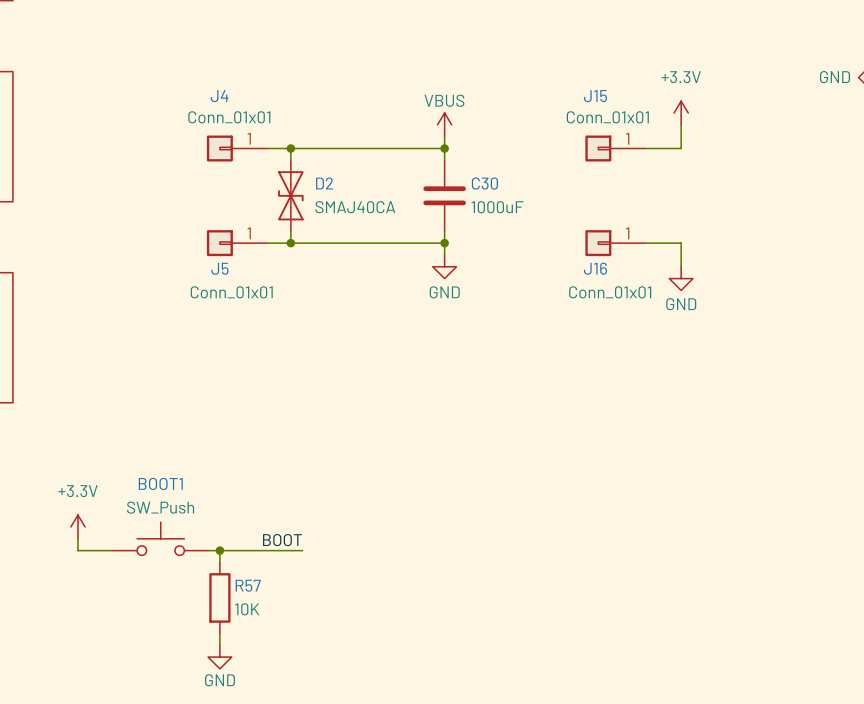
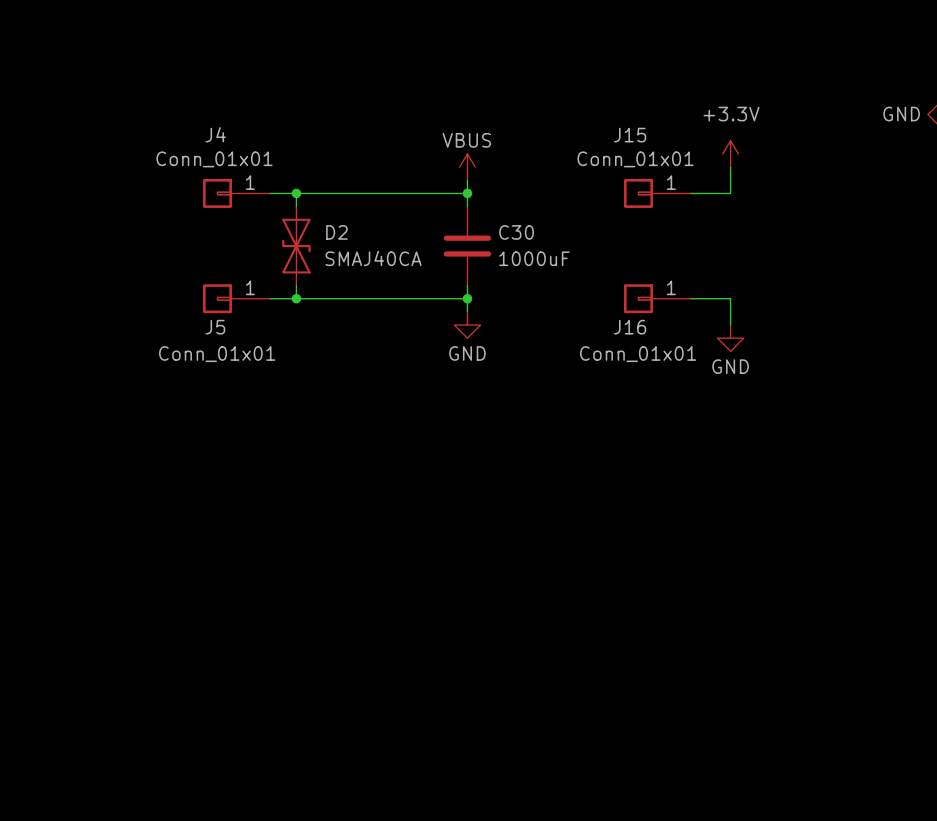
power symbol: +3.3V (77, 526) -> none
wire: (77, 538) (77, 550) (113, 550) -> none
BOOT1: SW_Push (160, 538) -> none
label: BOOT (282, 540) -> none
wire: (208, 550) (302, 550) -> none
wire: (219, 550) (219, 562) -> none
junction: (219, 550) -> none
R57: 10K (219, 597) -> none
wire: (219, 633) (219, 645) -> none
power symbol: GND (219, 657) -> none

